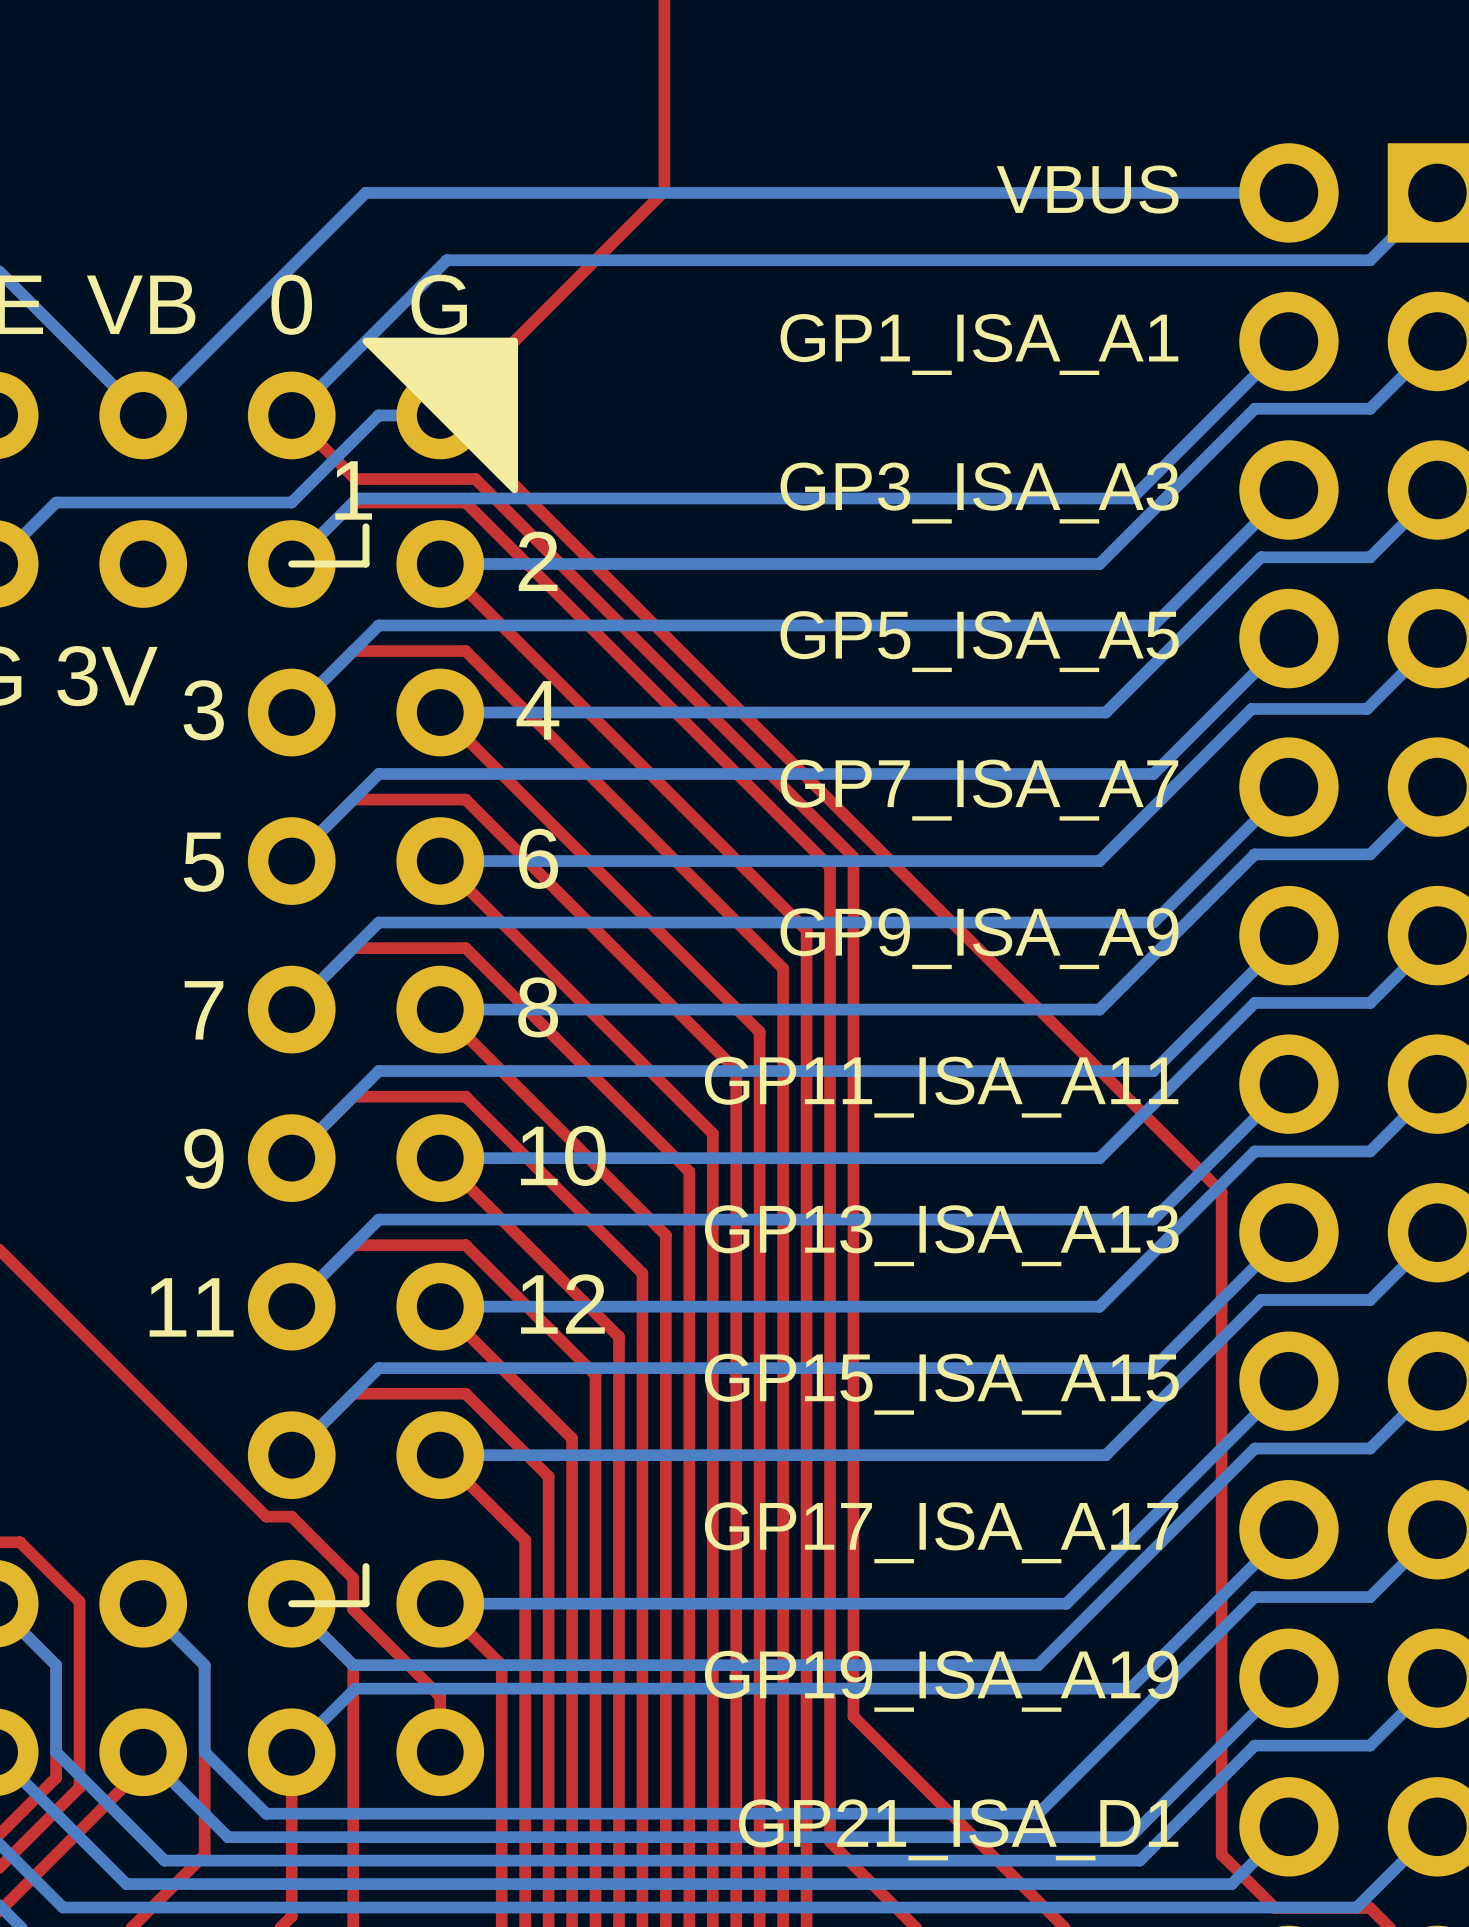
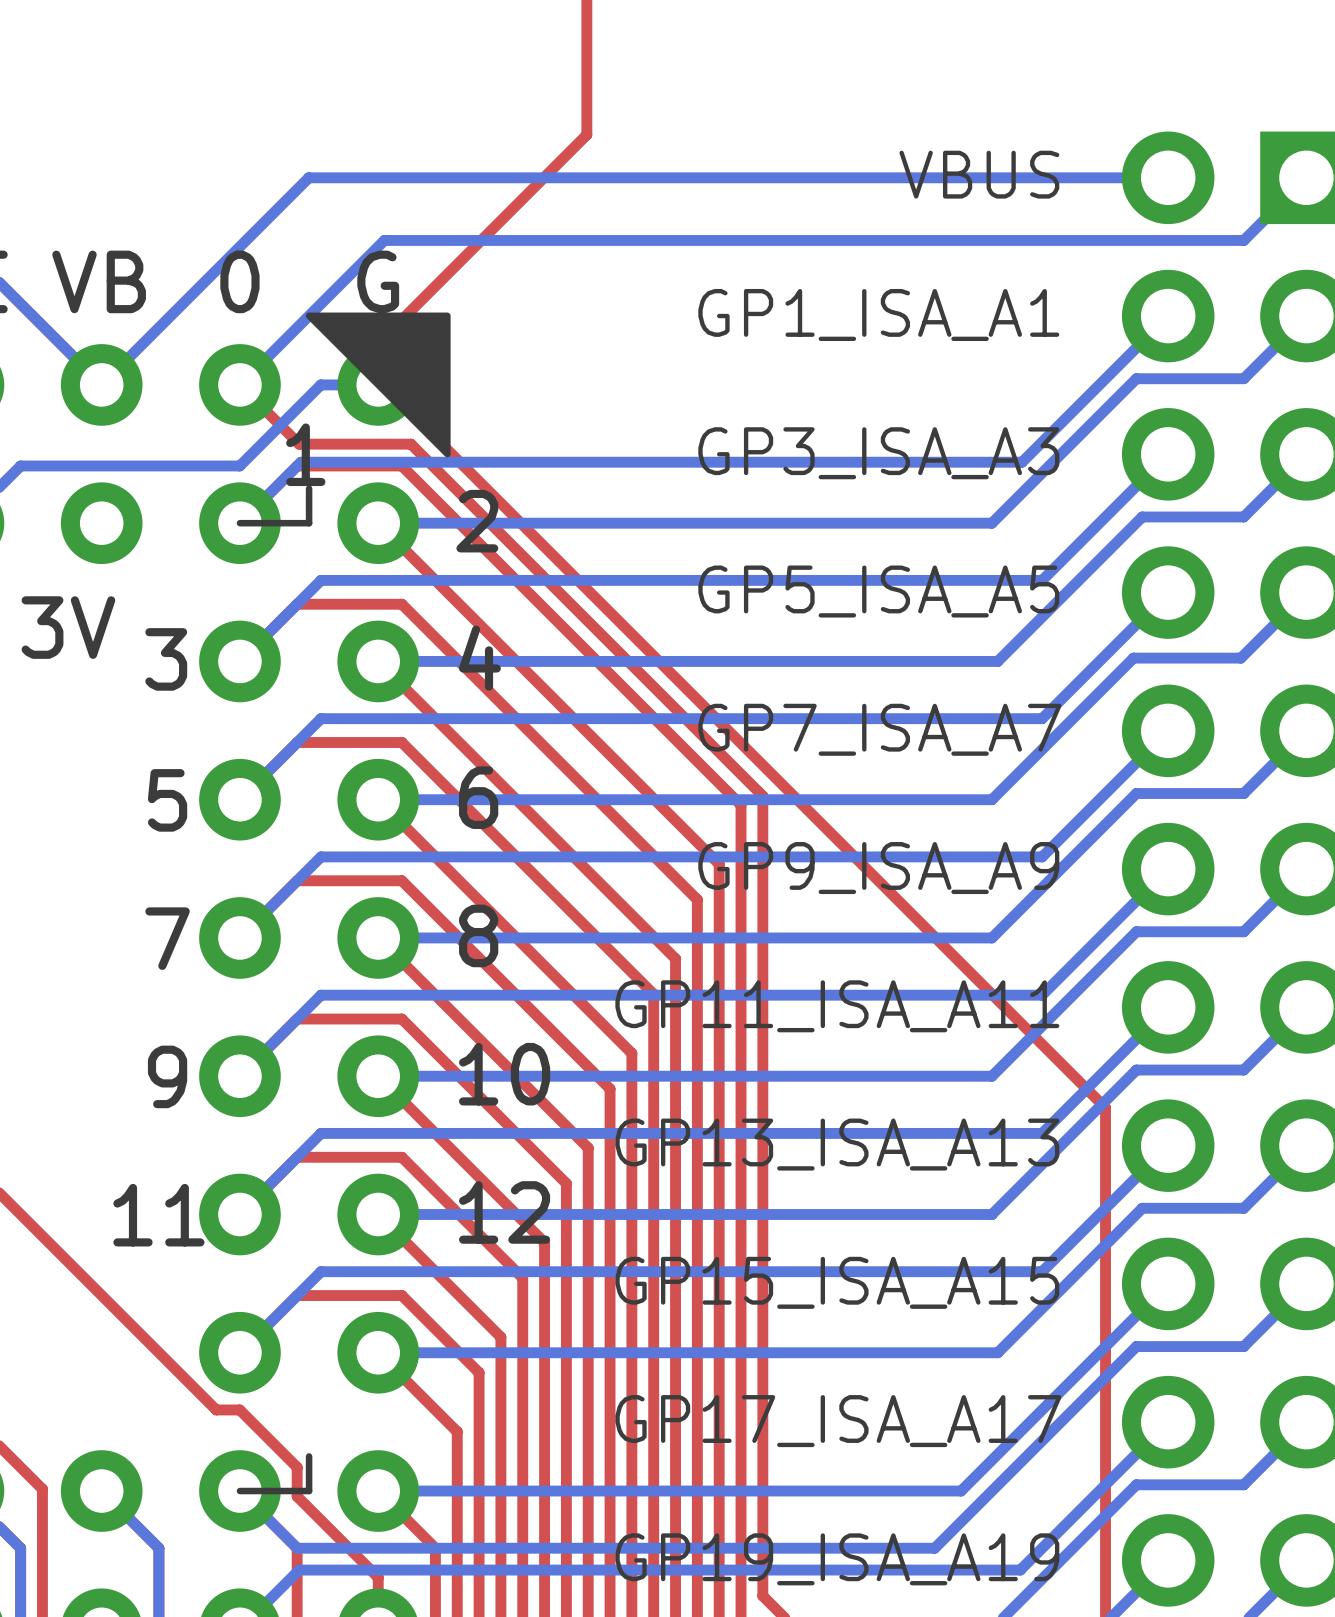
top track: (664, 146) (664, 191) (440, 415) -> (586, 134) (378, 343)

